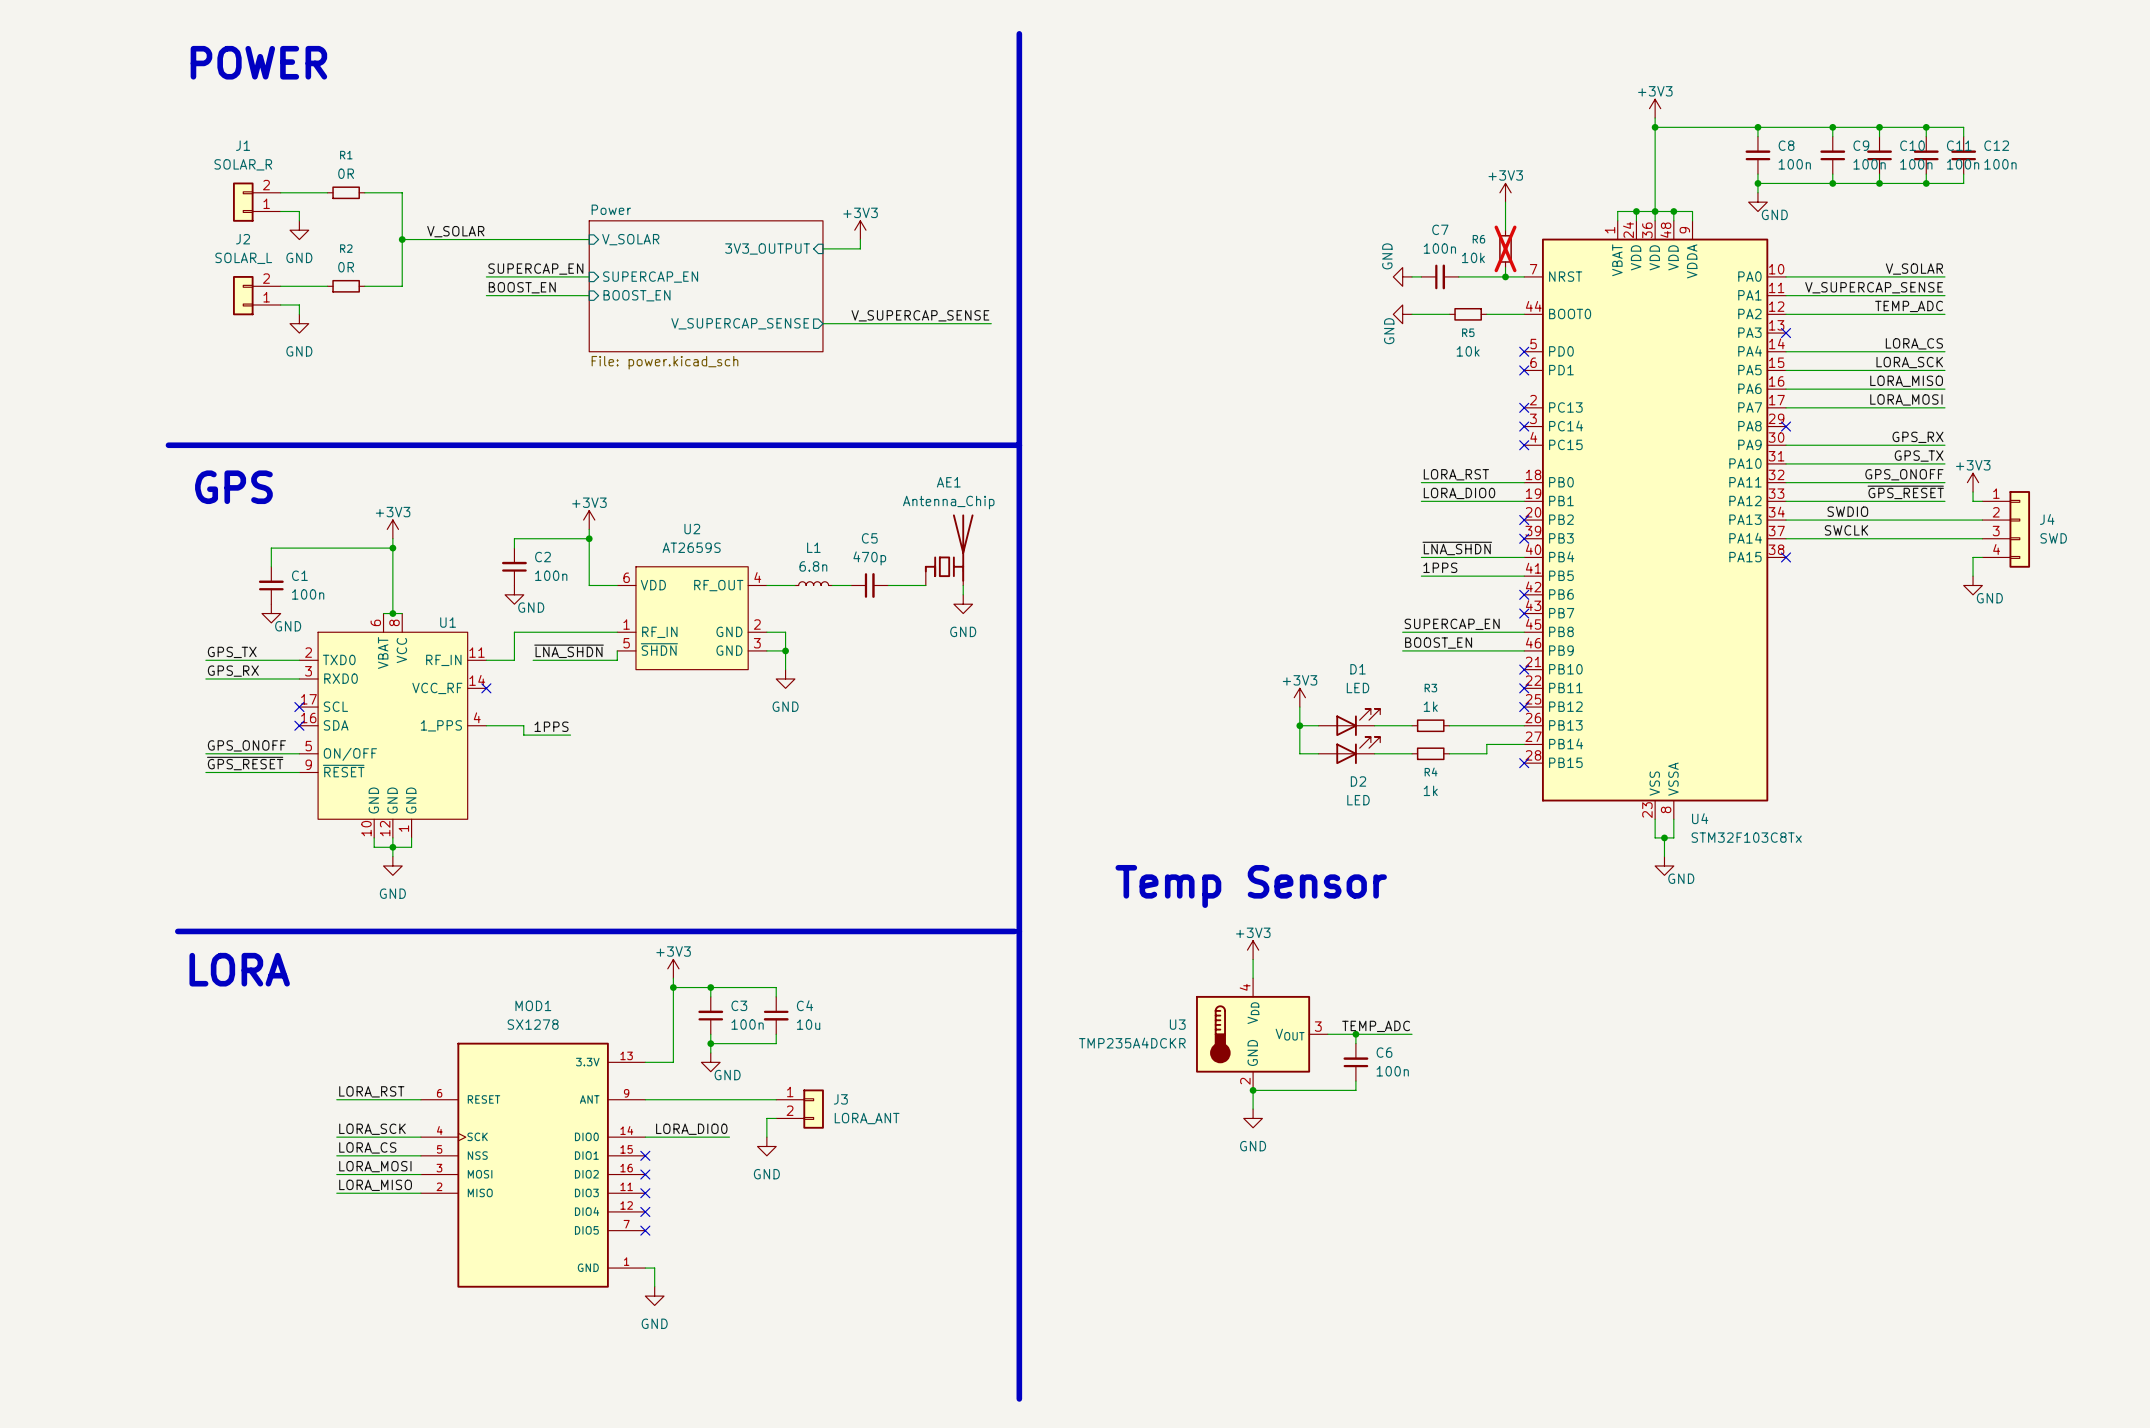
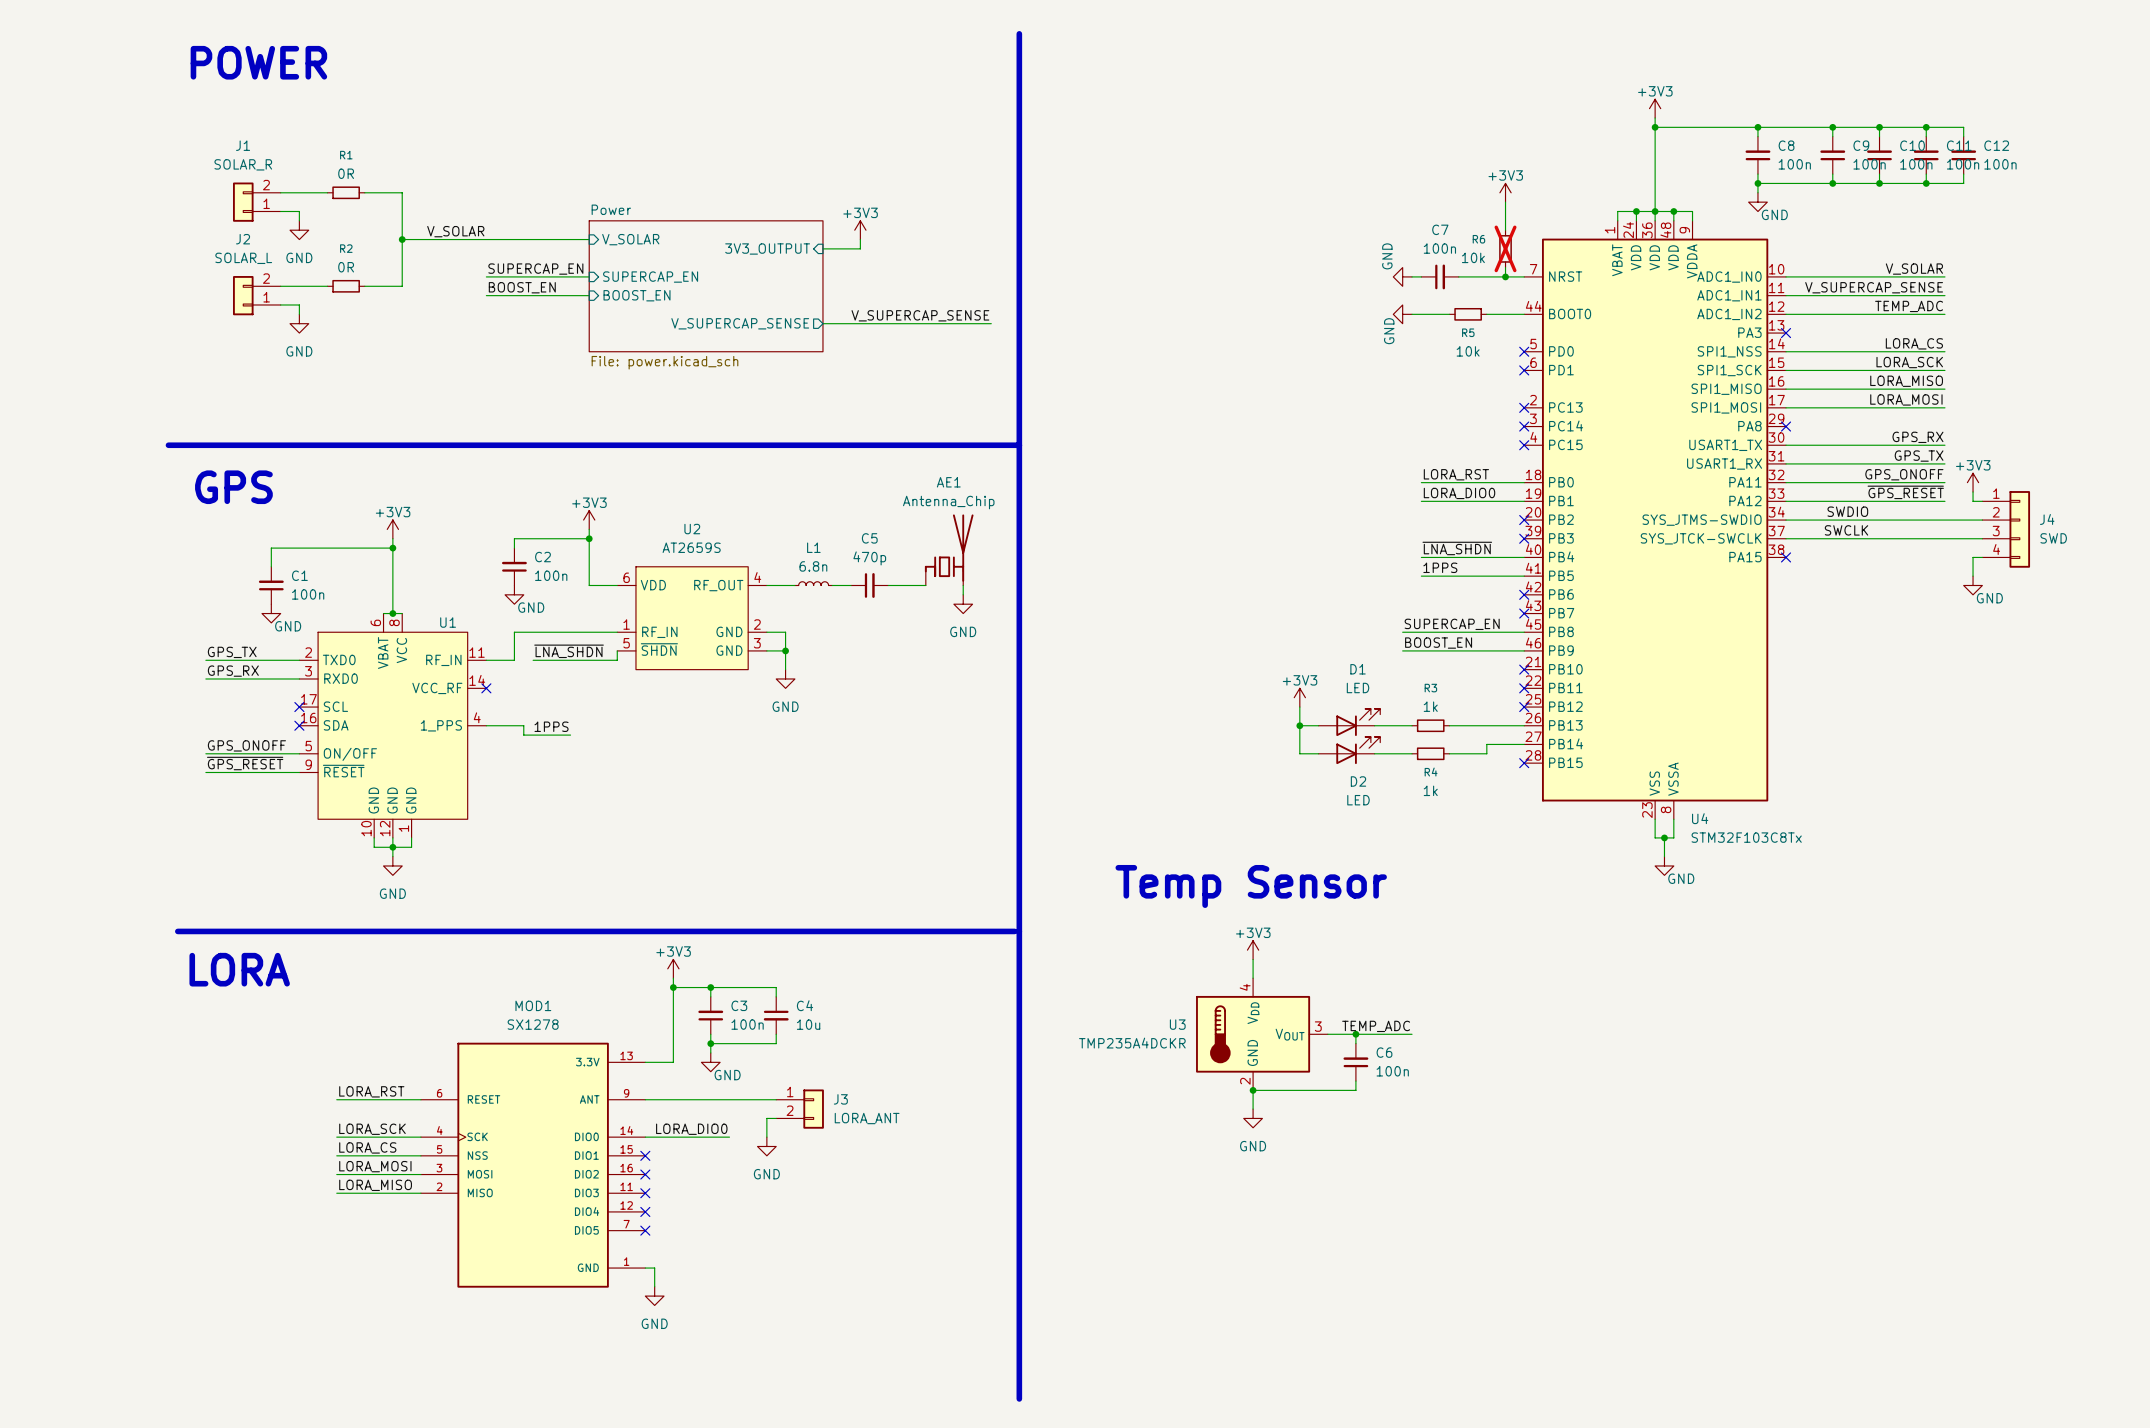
U4 symbol: [1524, 220, 1787, 820] -> [1524, 220, 1787, 820]

